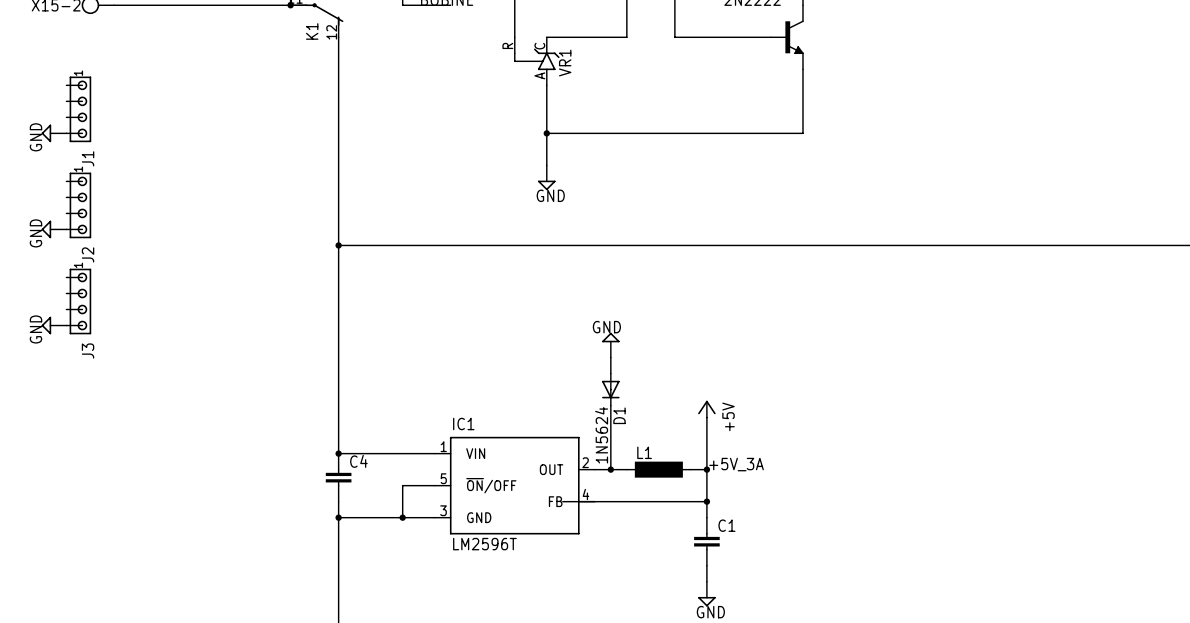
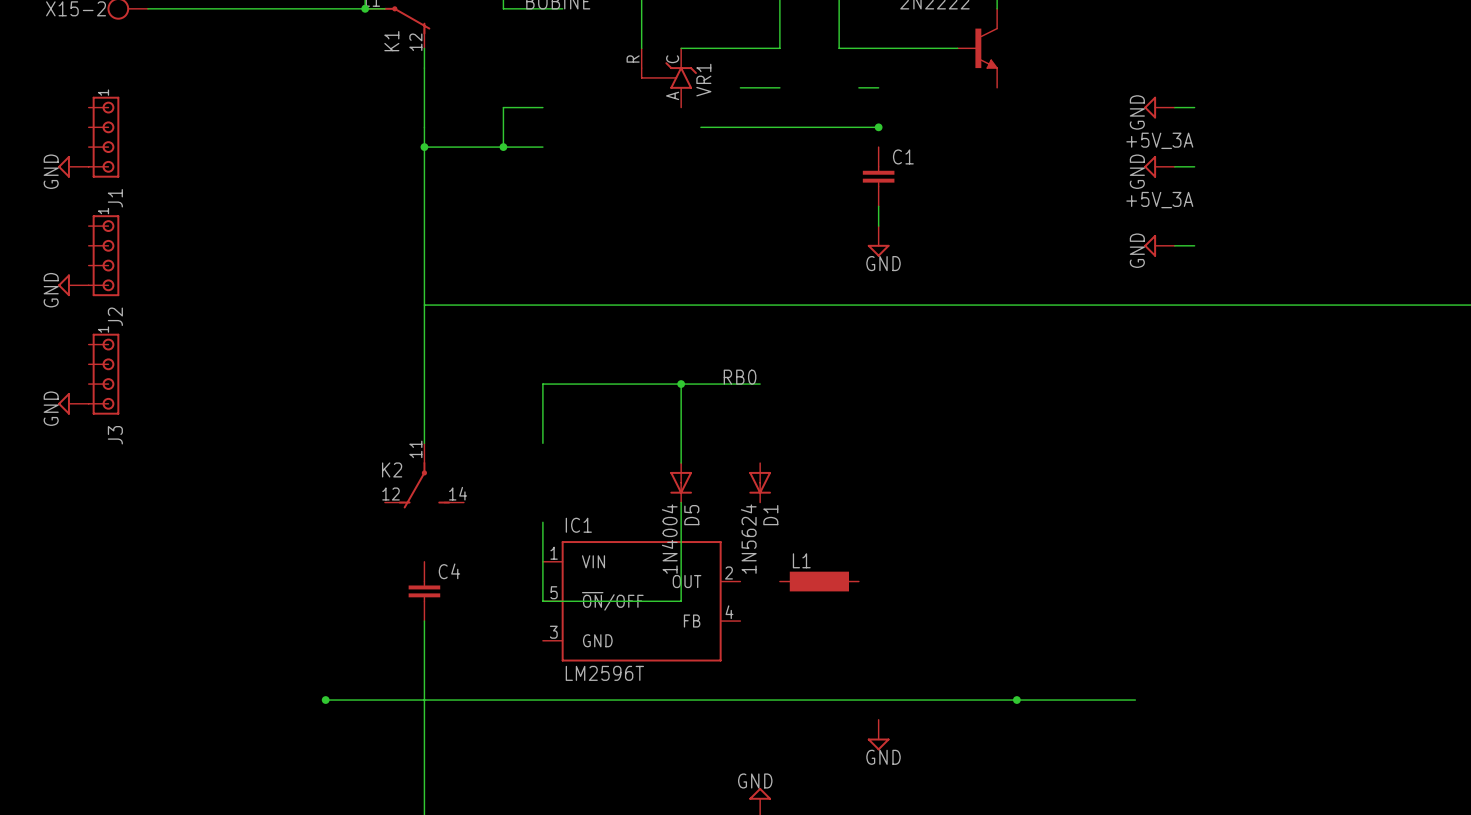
wire: none -> (740, 87) (779, 87)
wire: none -> (858, 87) (878, 87)
wire: (802, 69) (802, 133) (546, 133) -> none
wire: none -> (542, 107) (503, 107) (503, 147)
wire: (546, 85) (546, 165) -> none
power symbol: none -> GND (1159, 107)
wire: none -> (1174, 107) (1194, 107)
wire: none -> (700, 127) (878, 127)
junction: none -> (878, 127)
label: none -> +5V_3A (1159, 140)
wire: none -> (424, 147) (542, 147)
junction: none -> (424, 147)
junction: none -> (503, 147)
junction: (546, 133) -> none
power symbol: none -> GND (1159, 166)
wire: none -> (1174, 166) (1194, 166)
label: none -> +5V_3A (1159, 200)
wire: none -> (878, 206) (878, 226)
power symbol: GND (546, 177) -> none
power symbol: none -> GND (878, 241)
power symbol: none -> GND (1159, 245)
wire: none -> (1174, 245) (1194, 245)
junction: (338, 245) -> none
label: none -> RB0 (740, 377)
junction: none -> (681, 384)
wire: none -> (760, 384) (542, 384) (542, 443)
power symbol: GND (610, 345) -> none
wire: (338, 357) (338, 453) (434, 453) -> none
wire: (610, 357) (610, 373) -> none
K2: none -> (424, 475)
D5: none -> 1N4004 (681, 482)
wire: none -> (681, 502) (681, 601) (542, 601) (542, 522)
wire: (610, 405) (610, 469) -> (681, 384) (681, 463)
power symbol: +5V (706, 409) -> none
wire: (706, 417) (706, 517) -> none
junction: (338, 453) -> none
label: +5V_3A (736, 464) -> none
wire: (594, 469) (626, 469) -> none
junction: (610, 469) -> none
wire: (690, 469) (706, 469) -> none
junction: (706, 469) -> none
wire: (434, 485) (402, 485) (402, 517) -> none
wire: (562, 501) (706, 501) -> none
junction: (706, 501) -> none
wire: (338, 517) (434, 517) -> none
junction: (338, 517) -> none
junction: (402, 517) -> none
C1 position: (706, 541) -> (878, 176)
wire: none -> (325, 700) (1135, 700)
junction: none -> (325, 700)
wire: (706, 565) (706, 581) -> none
junction: none -> (1016, 700)

